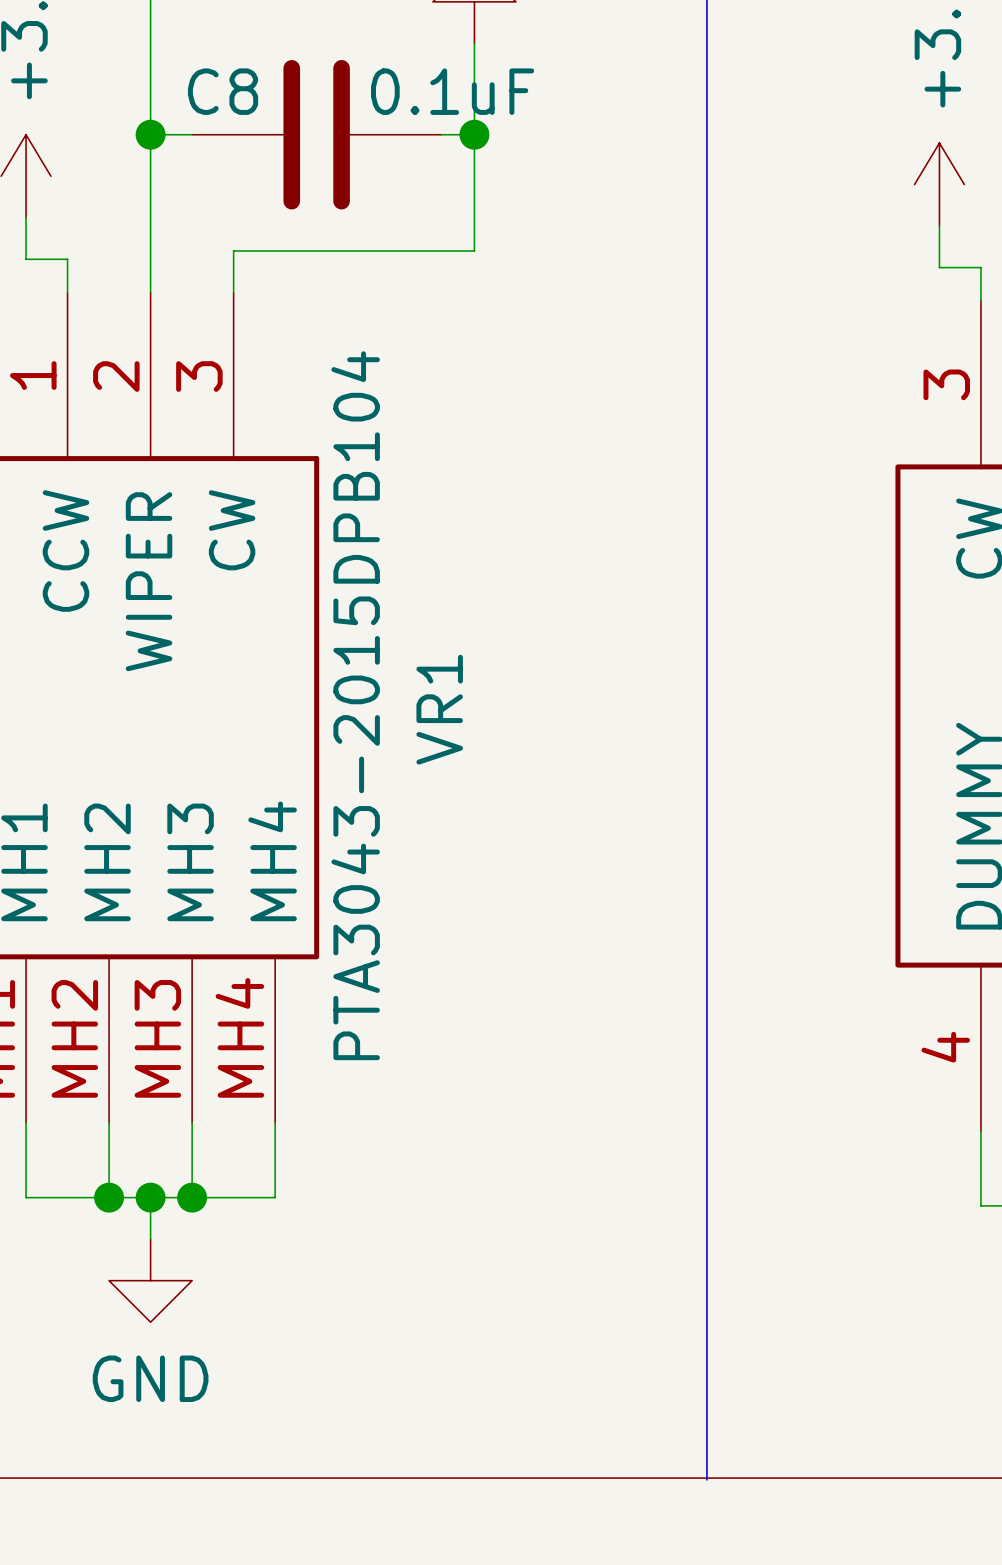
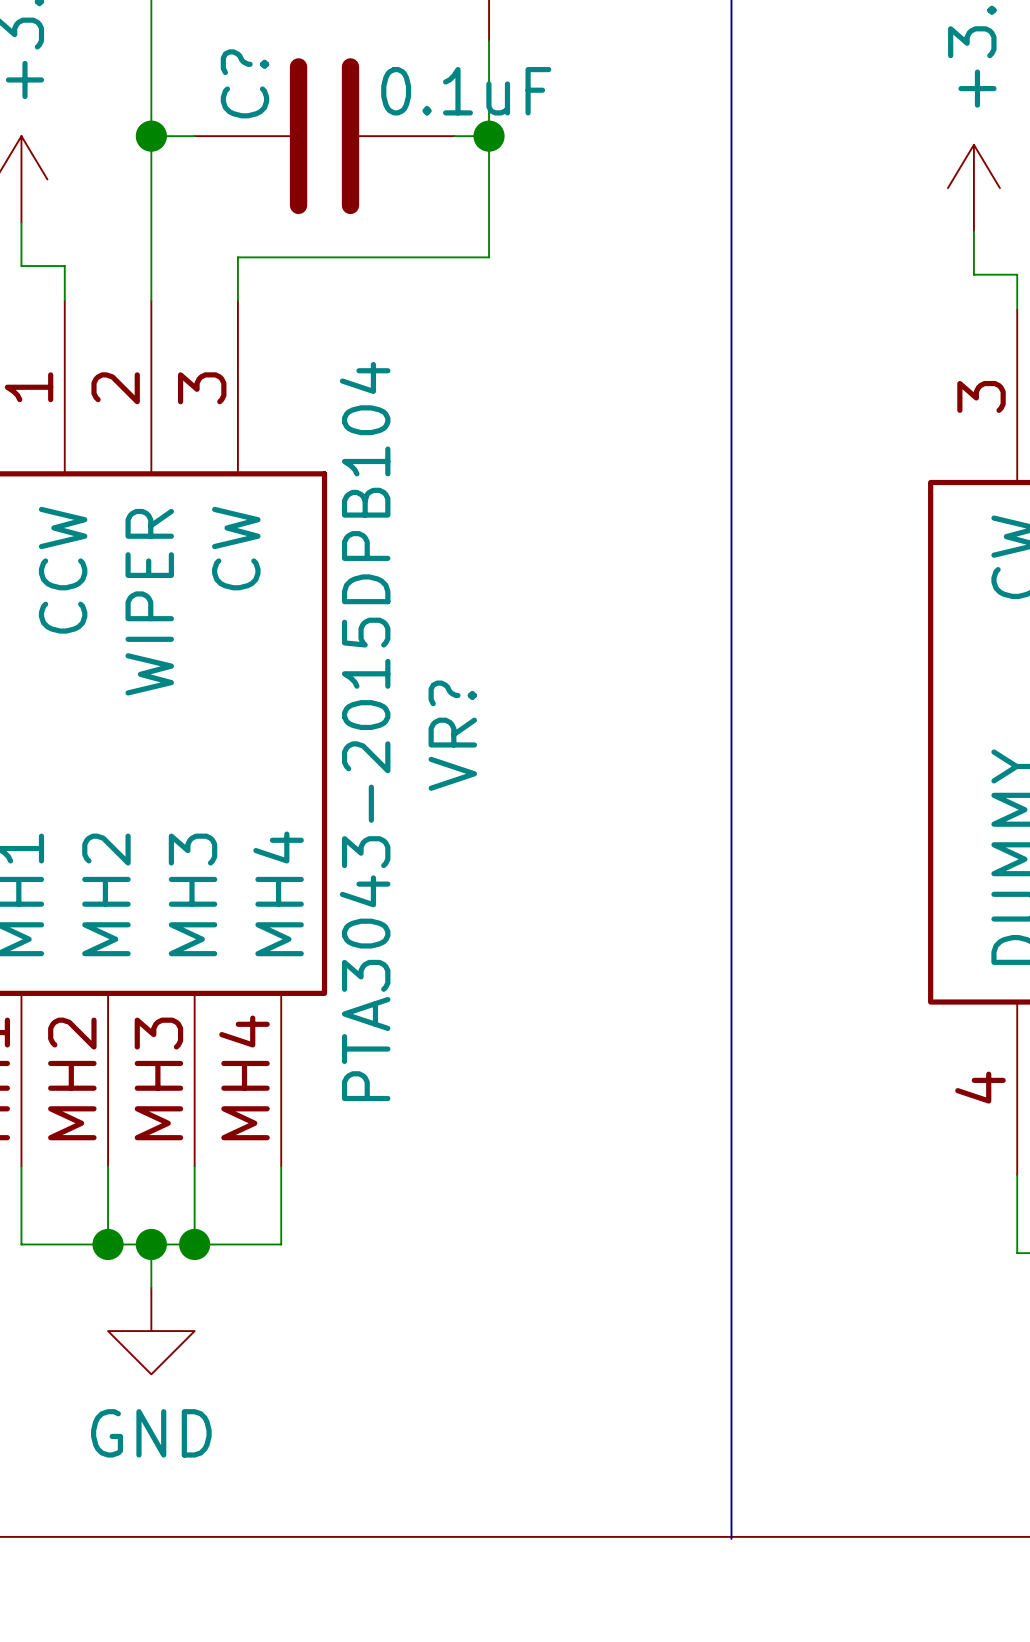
C8 name: C8 (223, 91) -> C? (244, 83)
VR1 name: VR1 (439, 709) -> VR? (452, 735)

